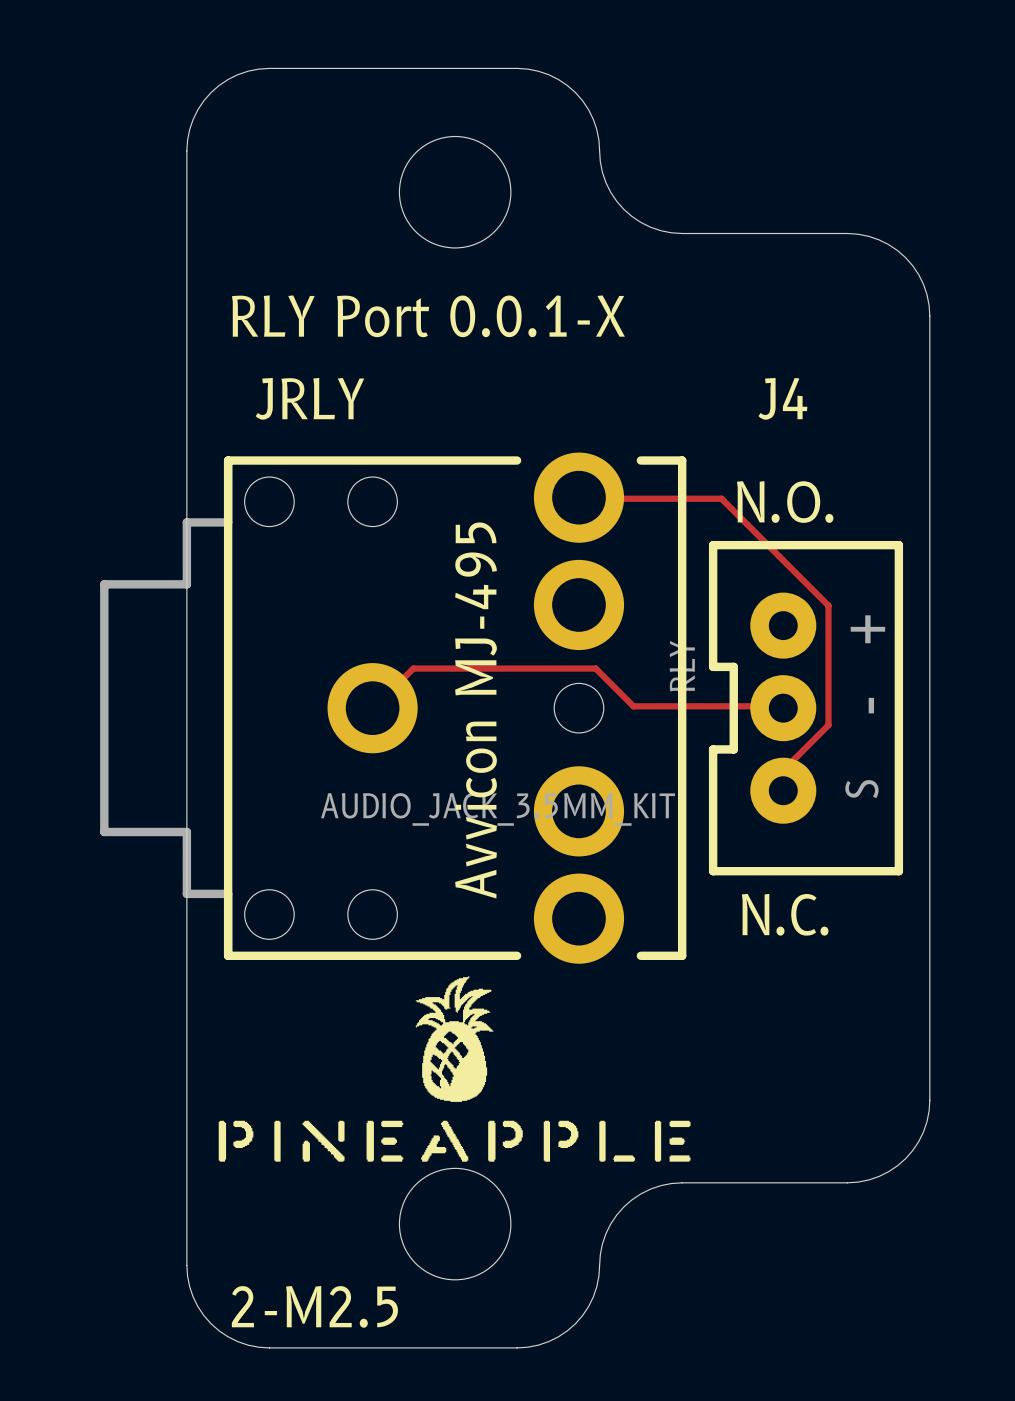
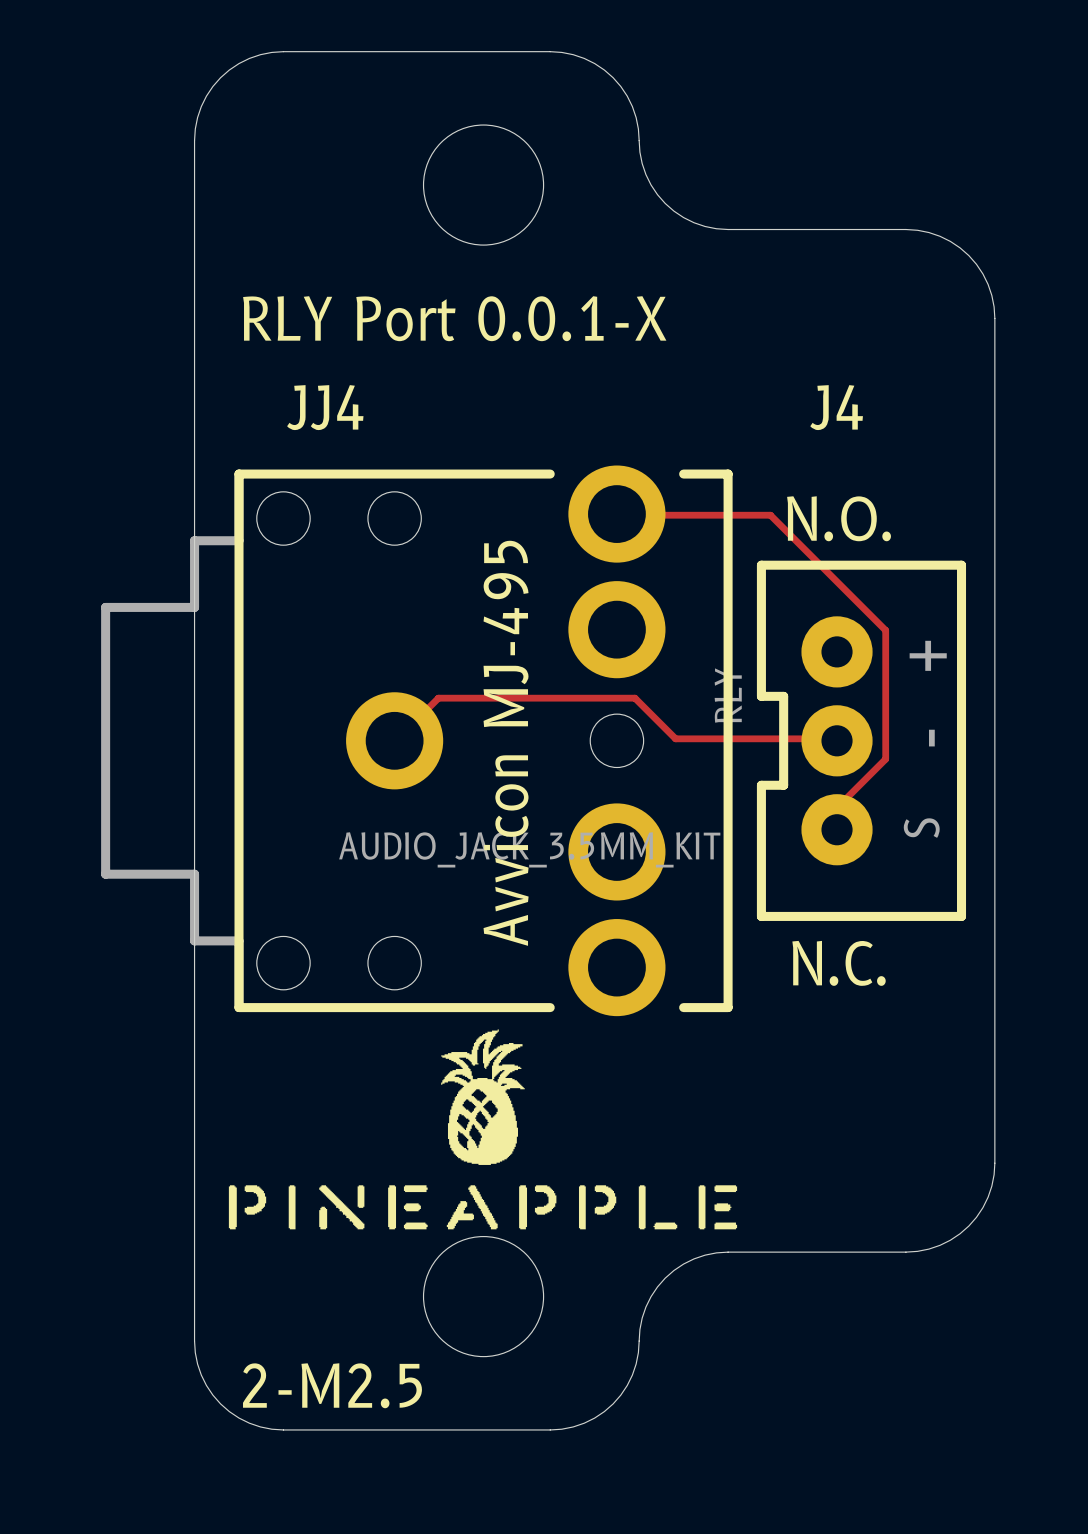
JRLY name: JRLY (309, 398) -> JJ4 (325, 407)

